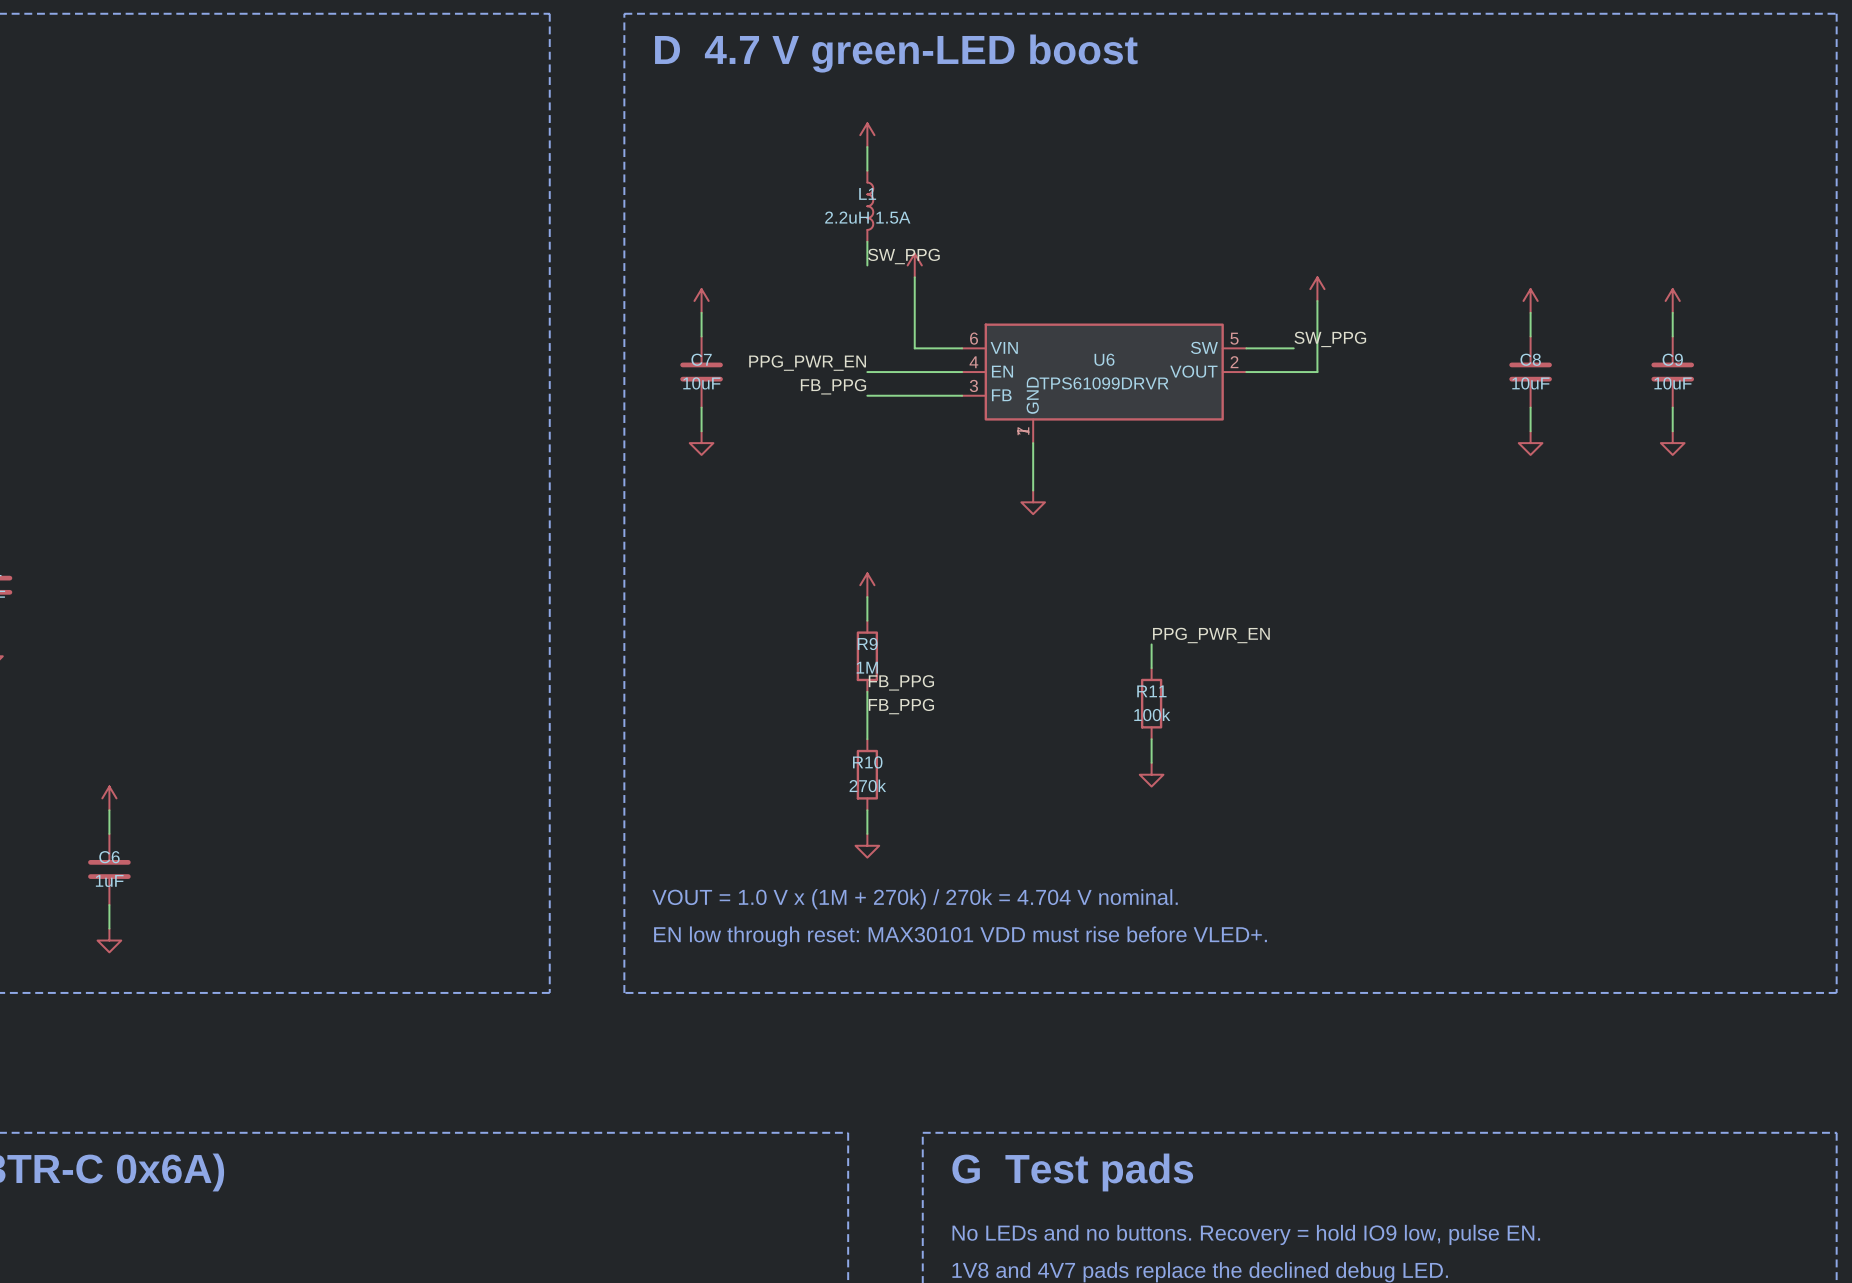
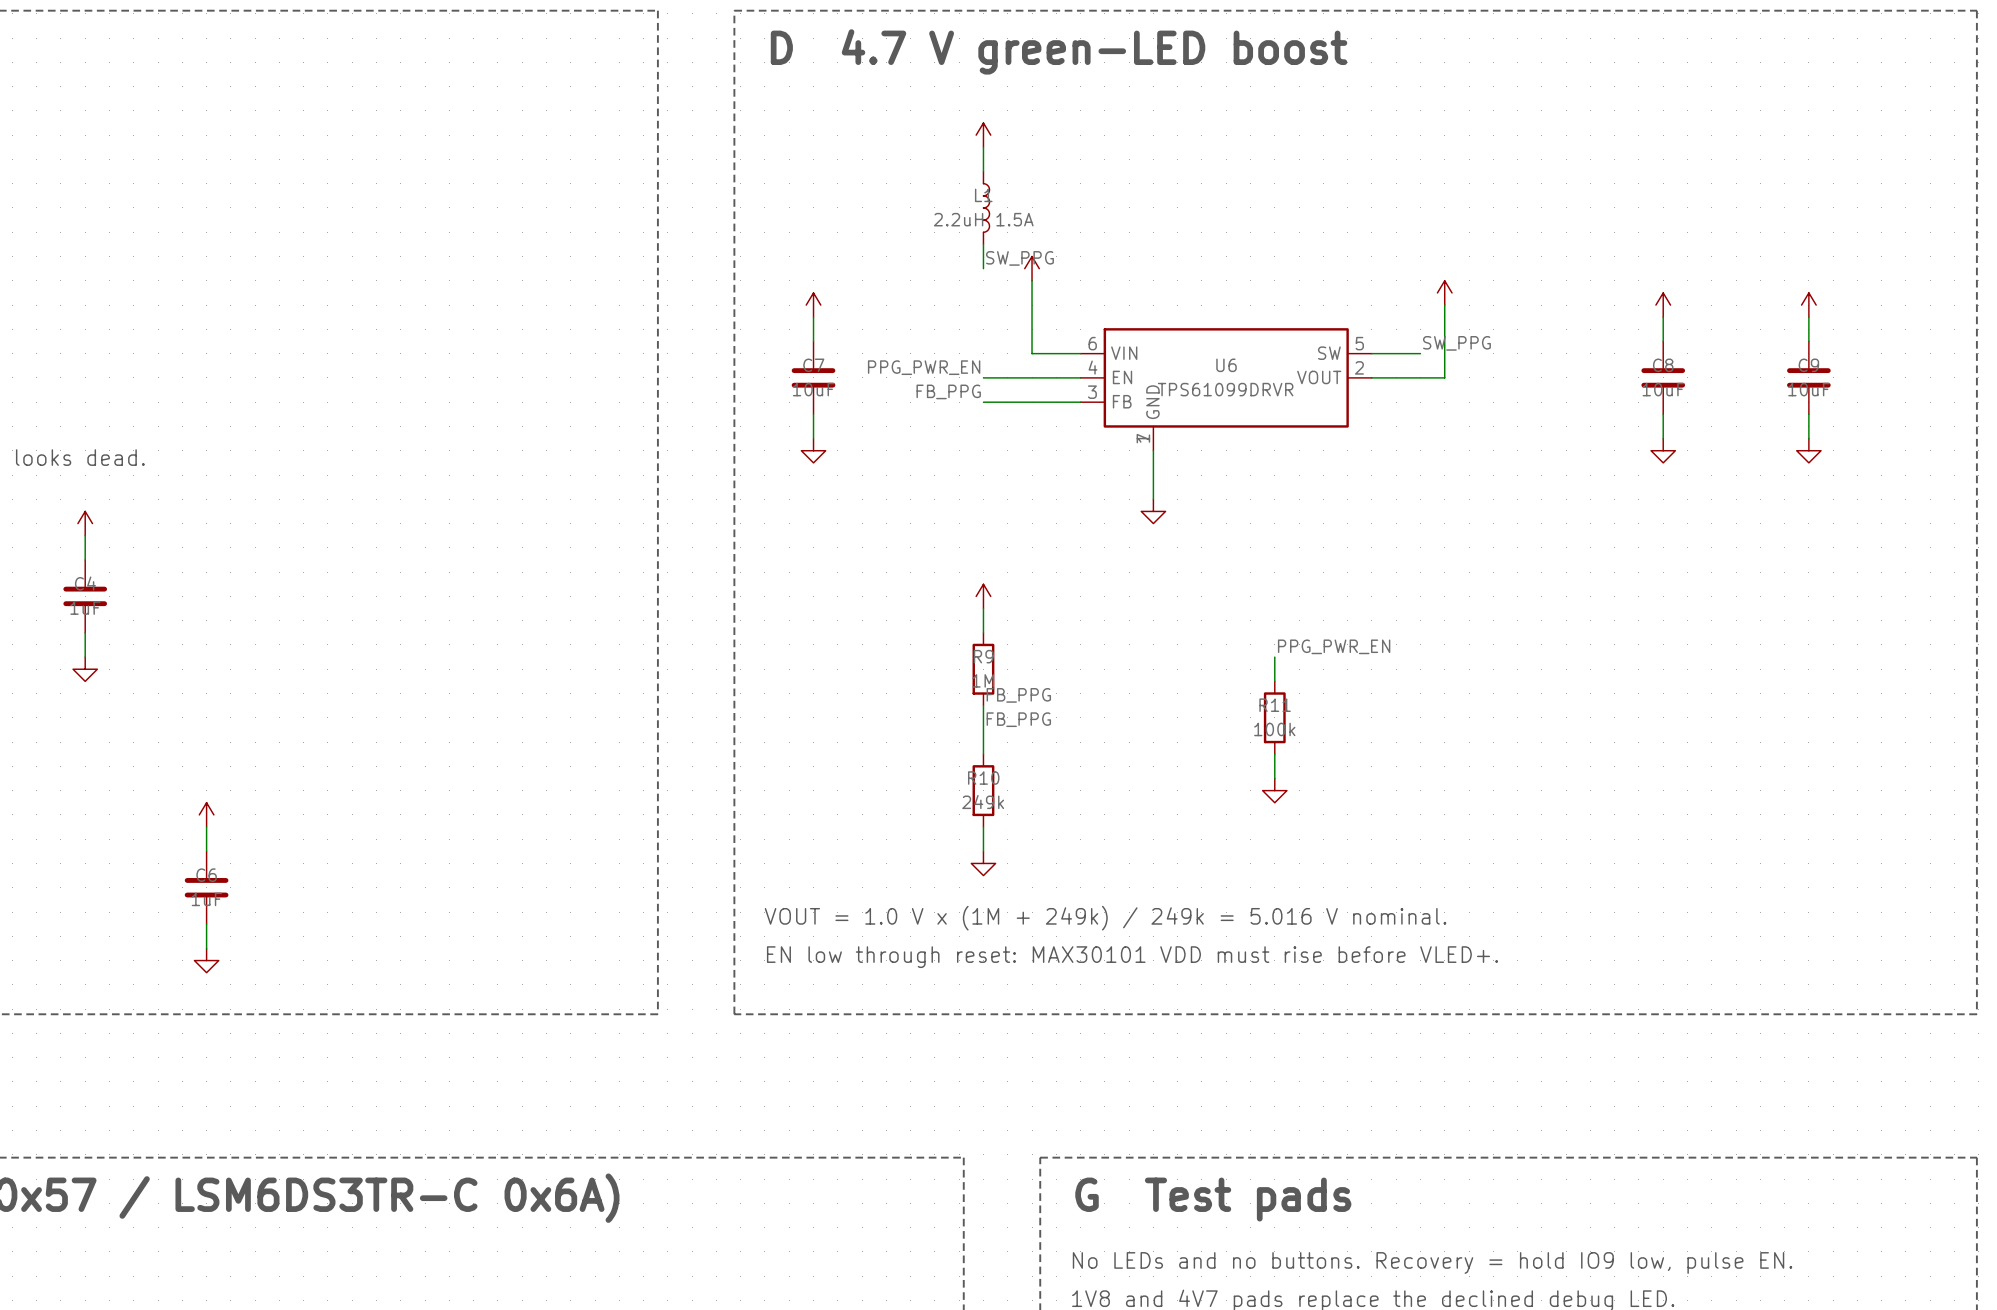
R10 value: 270k (867, 785) -> 249k (983, 802)
text: VOUT = 1.0 V x (1M + 270k) / 270k = 4.704 V nominal. (915, 899) -> VOUT = 1.0 V x (1M + 249k) / 249k = 5.016 V nominal. (1105, 918)

